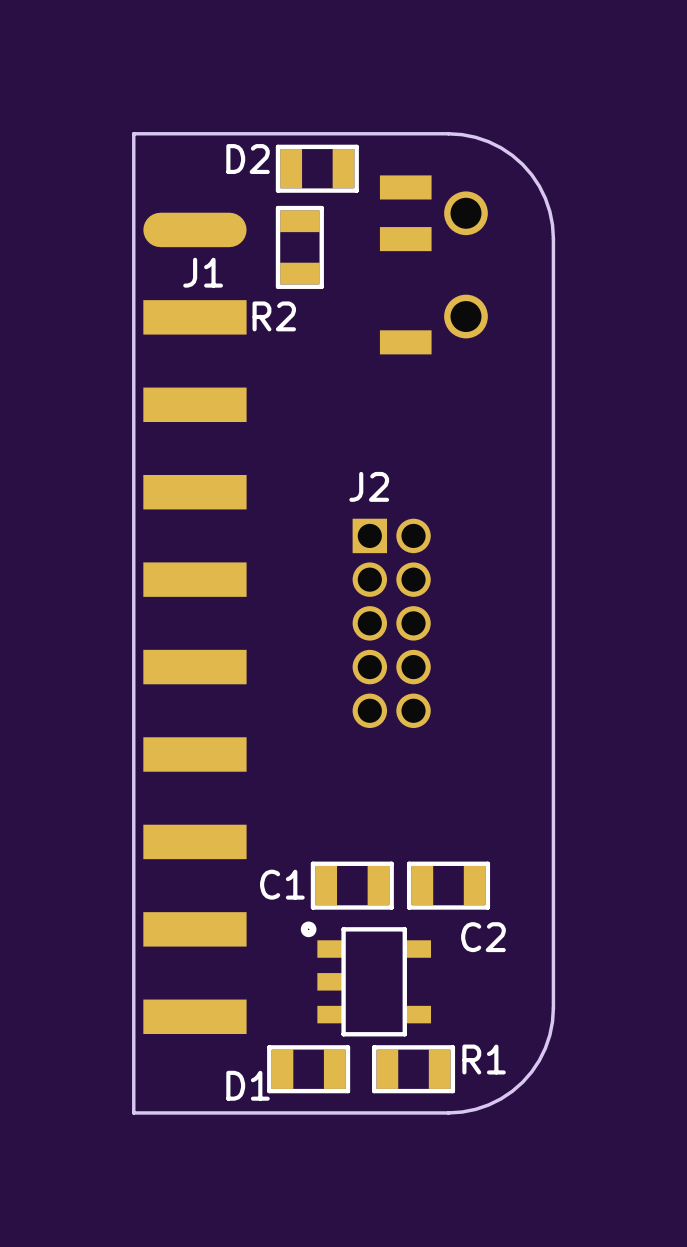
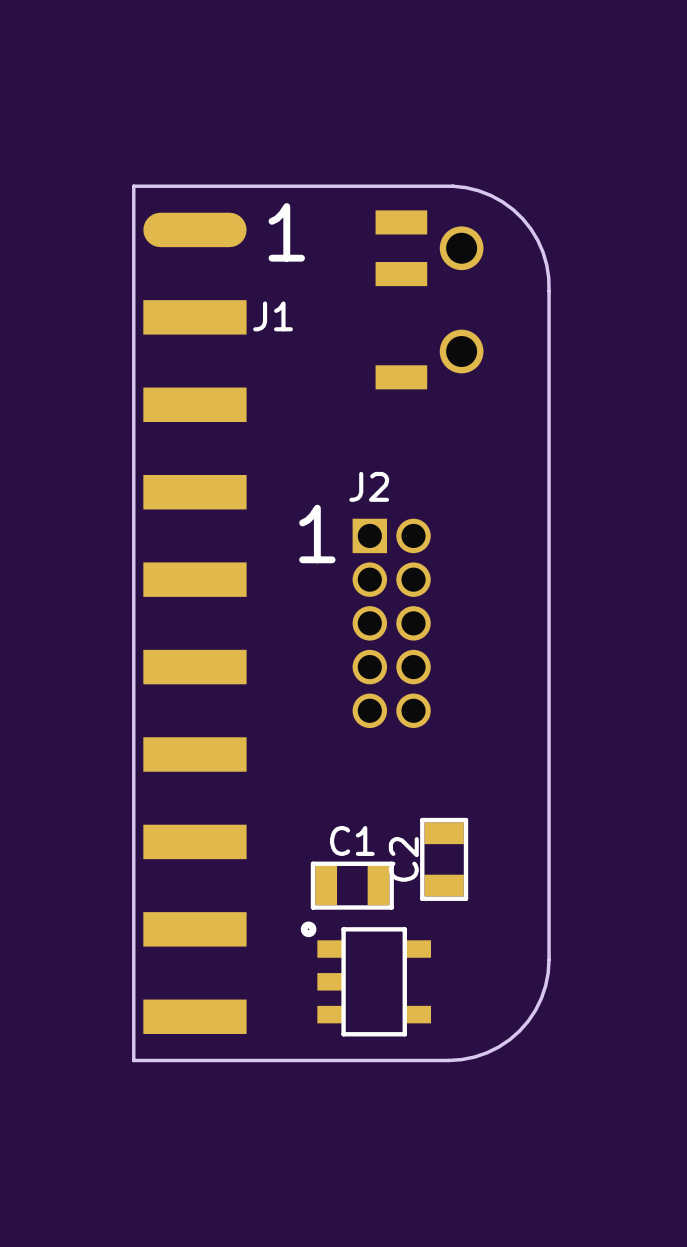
D2: (317, 168) -> none
board edge: (133, 186) (133, 133) (462, 134) (488, 141) (500, 147) (522, 164) (531, 174) (545, 198) (549, 211) (553, 238) (553, 1008) (549, 1035) (539, 1060) (531, 1071) (512, 1091) (488, 1104) (462, 1112) (133, 1112) (133, 1060) -> (133, 186) (452, 186) (478, 190) (491, 195) (513, 209) (530, 229) (543, 252) (548, 277) (549, 291) (549, 959) (545, 985) (535, 1010) (519, 1031) (498, 1047) (486, 1052) (461, 1059) (133, 1060)
J1 text: none -> 1 (286, 232)
R2: (299, 247) -> none
part position: (433, 264) -> (429, 299)
J1 name position: J1 (203, 272) -> J1 (273, 316)
text: none -> 1 (317, 534)
C1 name position: C1 (282, 884) -> C1 (352, 840)
C2 rotation: 0° (448, 885) -> 90° clockwise (444, 859)
D1: (308, 1069) -> none
R1: (413, 1069) -> none

